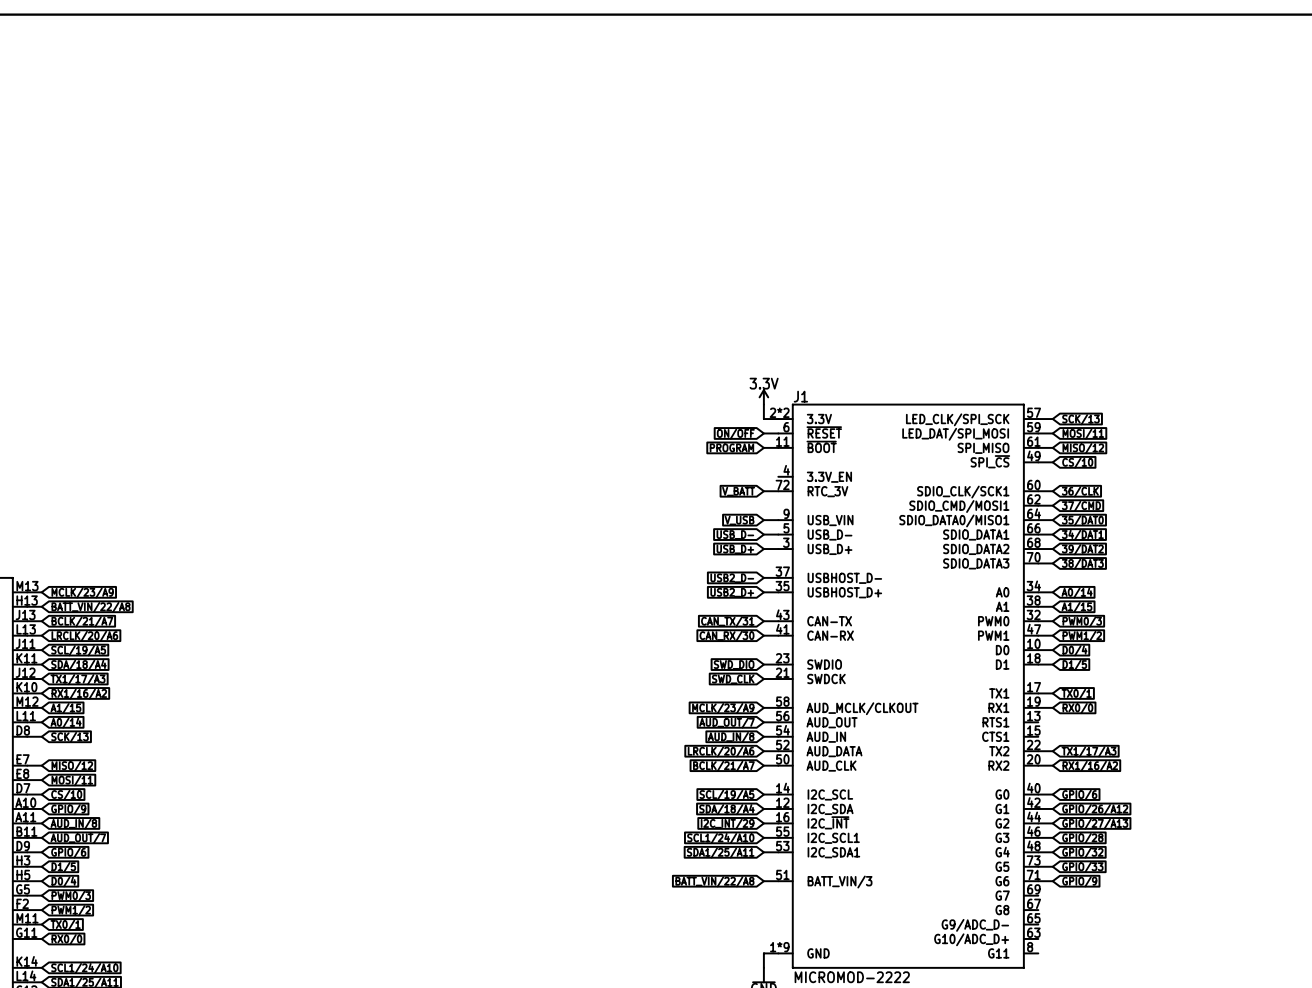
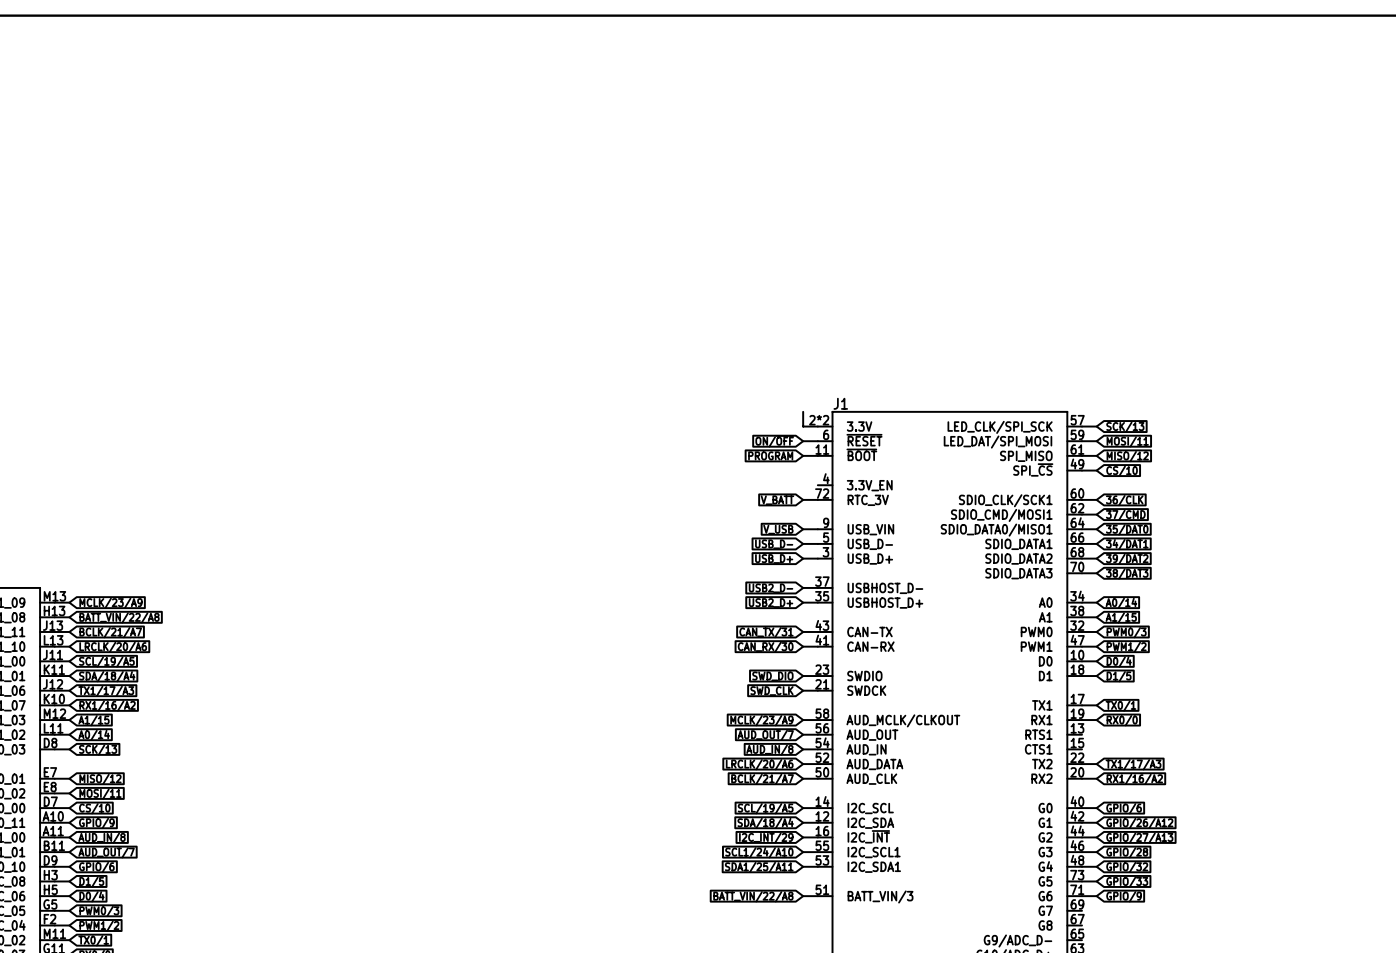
power symbol: 3.3V (763, 396) -> none

